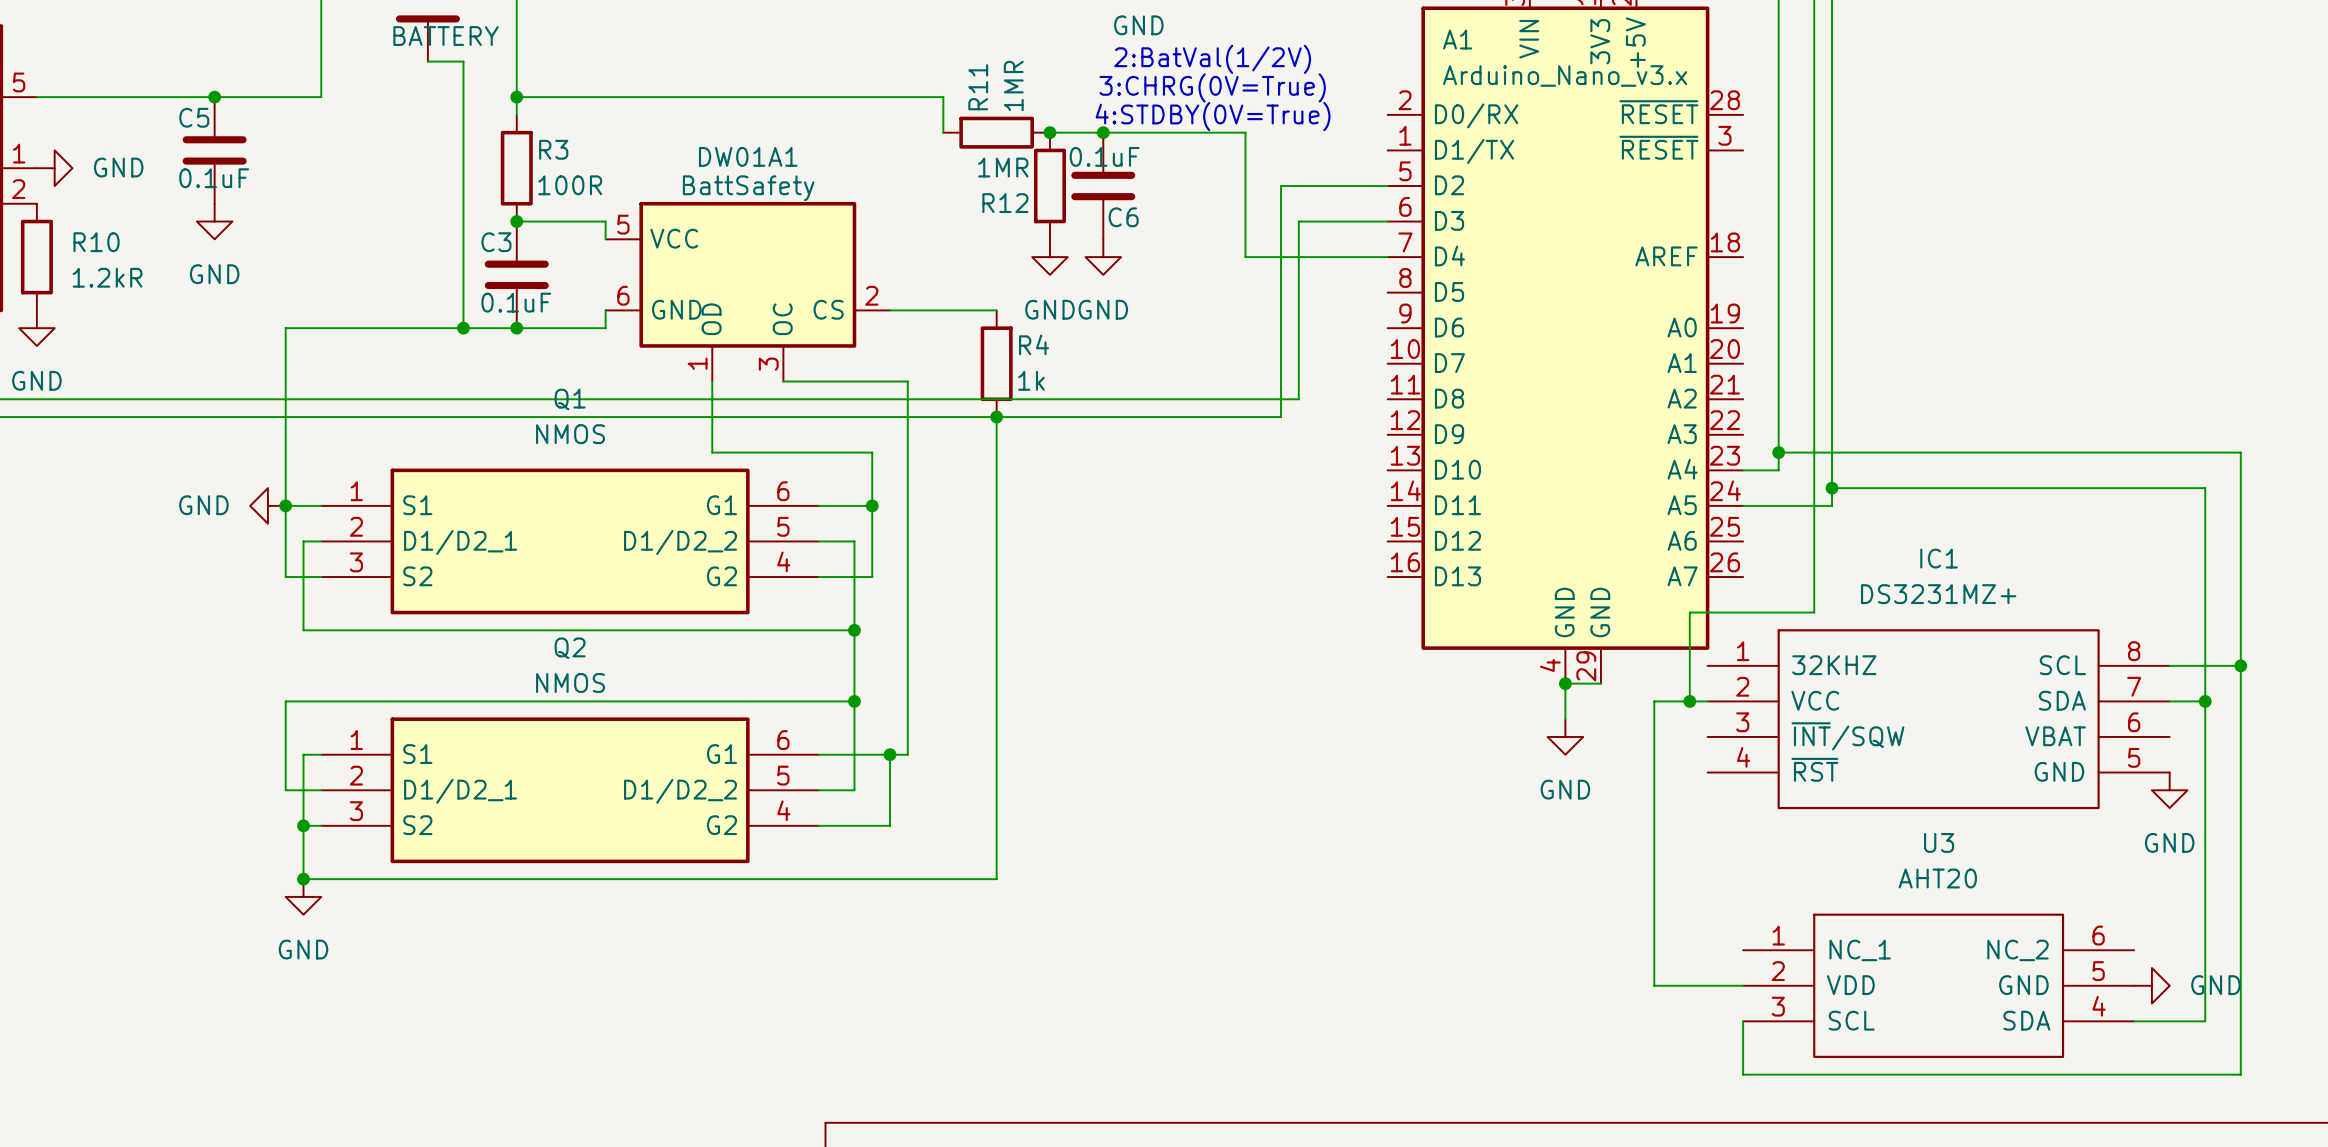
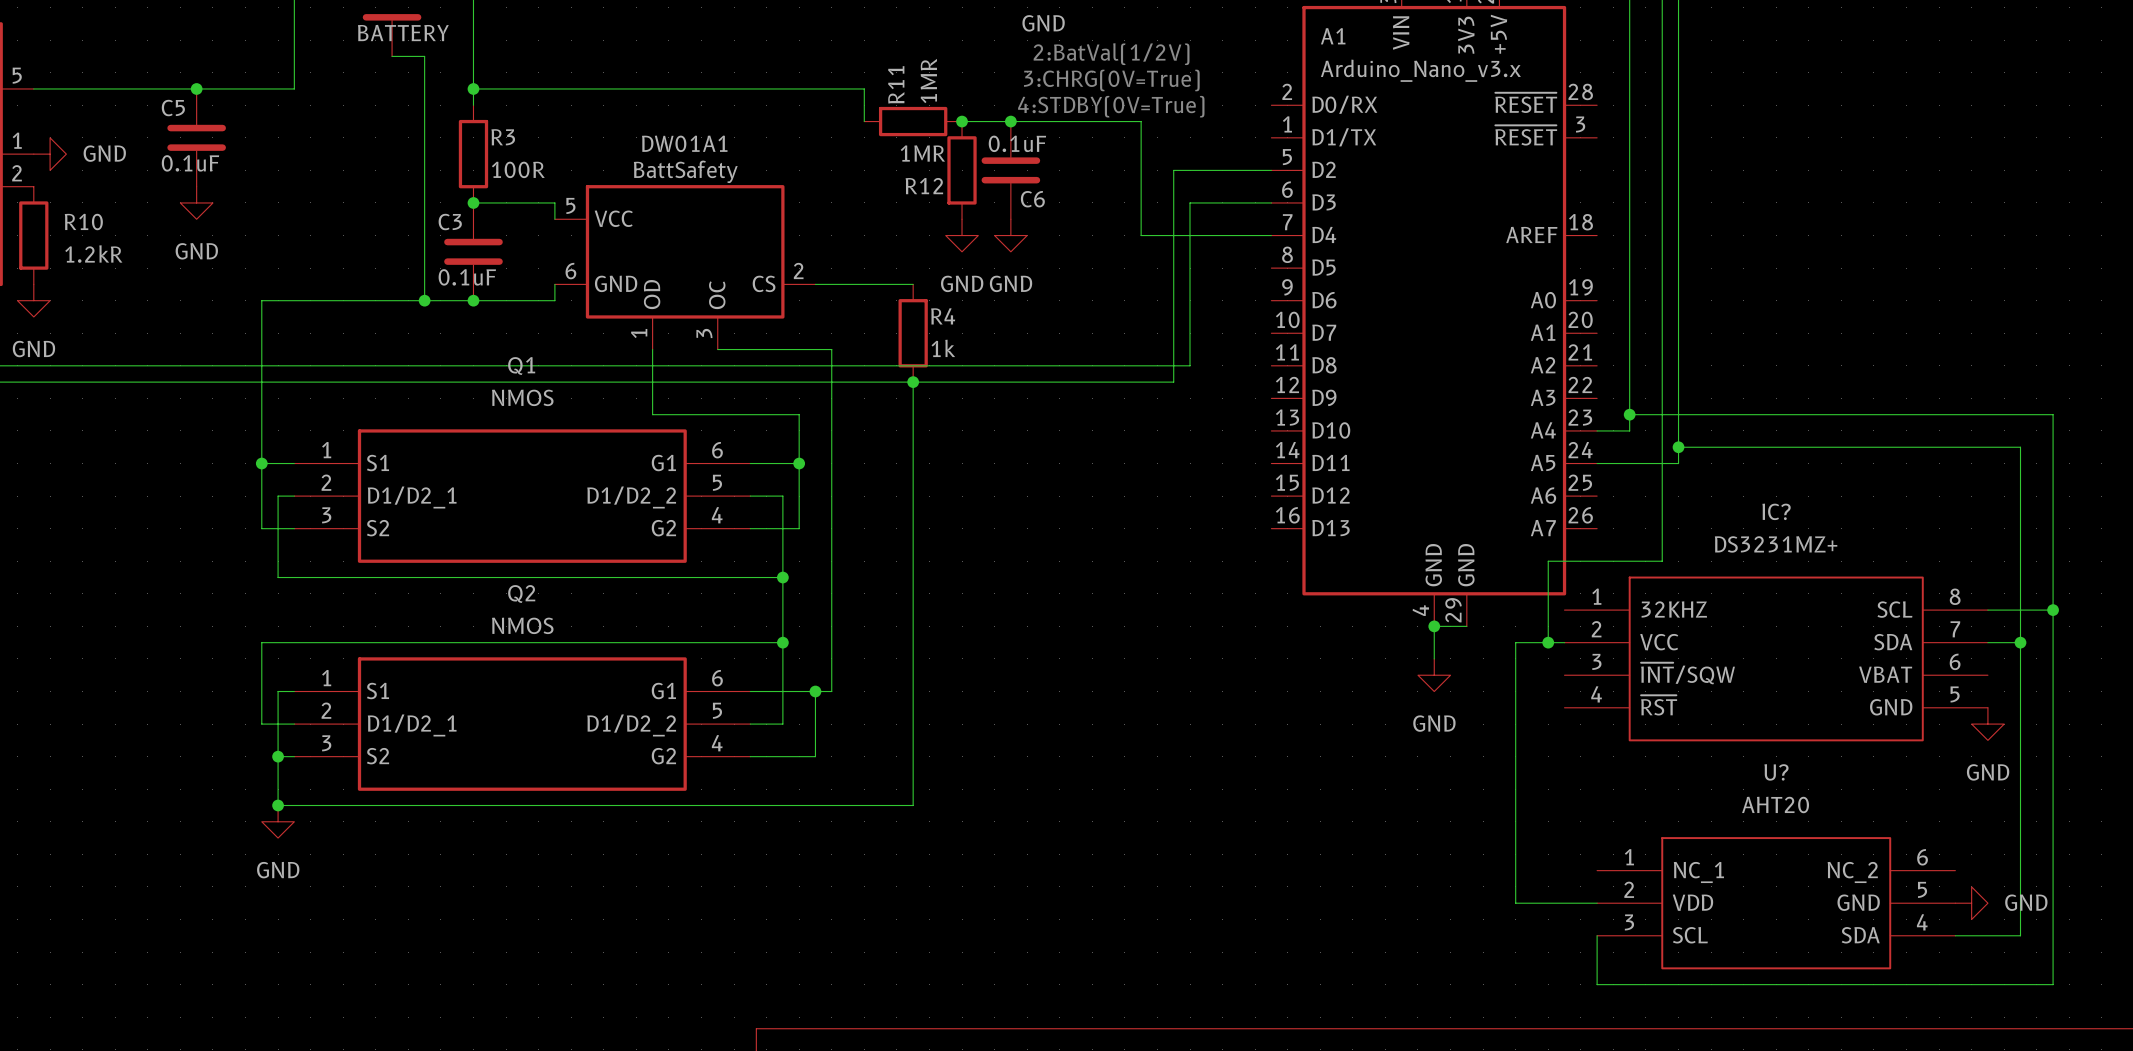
power symbol: GND (267, 505) -> none
IC1 name: IC1 (1939, 558) -> IC? (1776, 511)
U3 name: U3 (1939, 842) -> U? (1776, 772)

